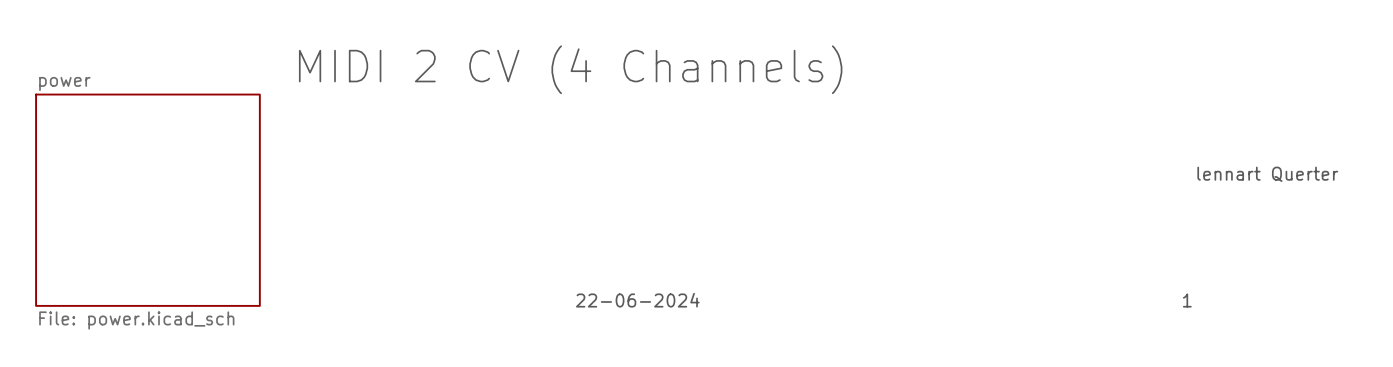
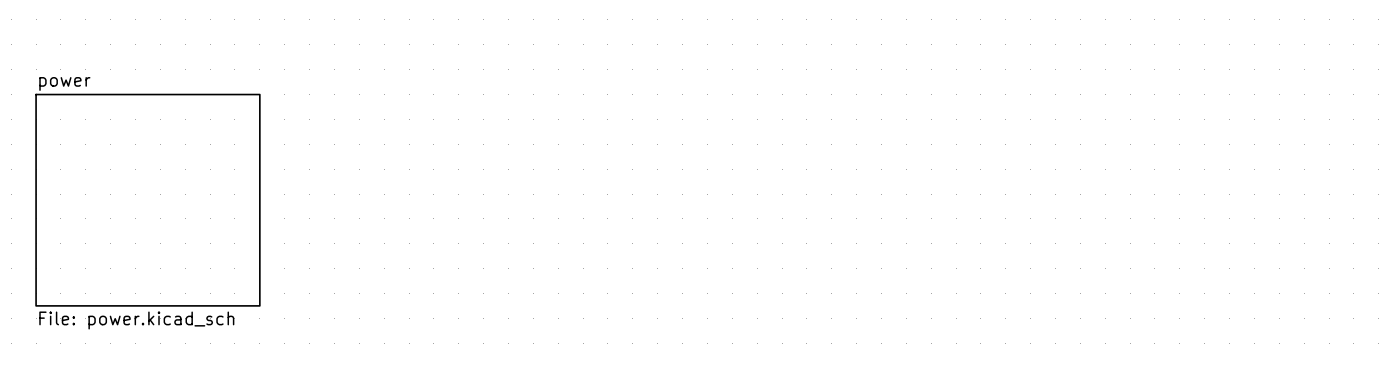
text: MIDI 2 CV (4 Channels) (570, 69) -> none
text: lennart Querter (1267, 174) -> none
text: 22-06-2024 (637, 300) -> none
text: 1 (1187, 300) -> none

